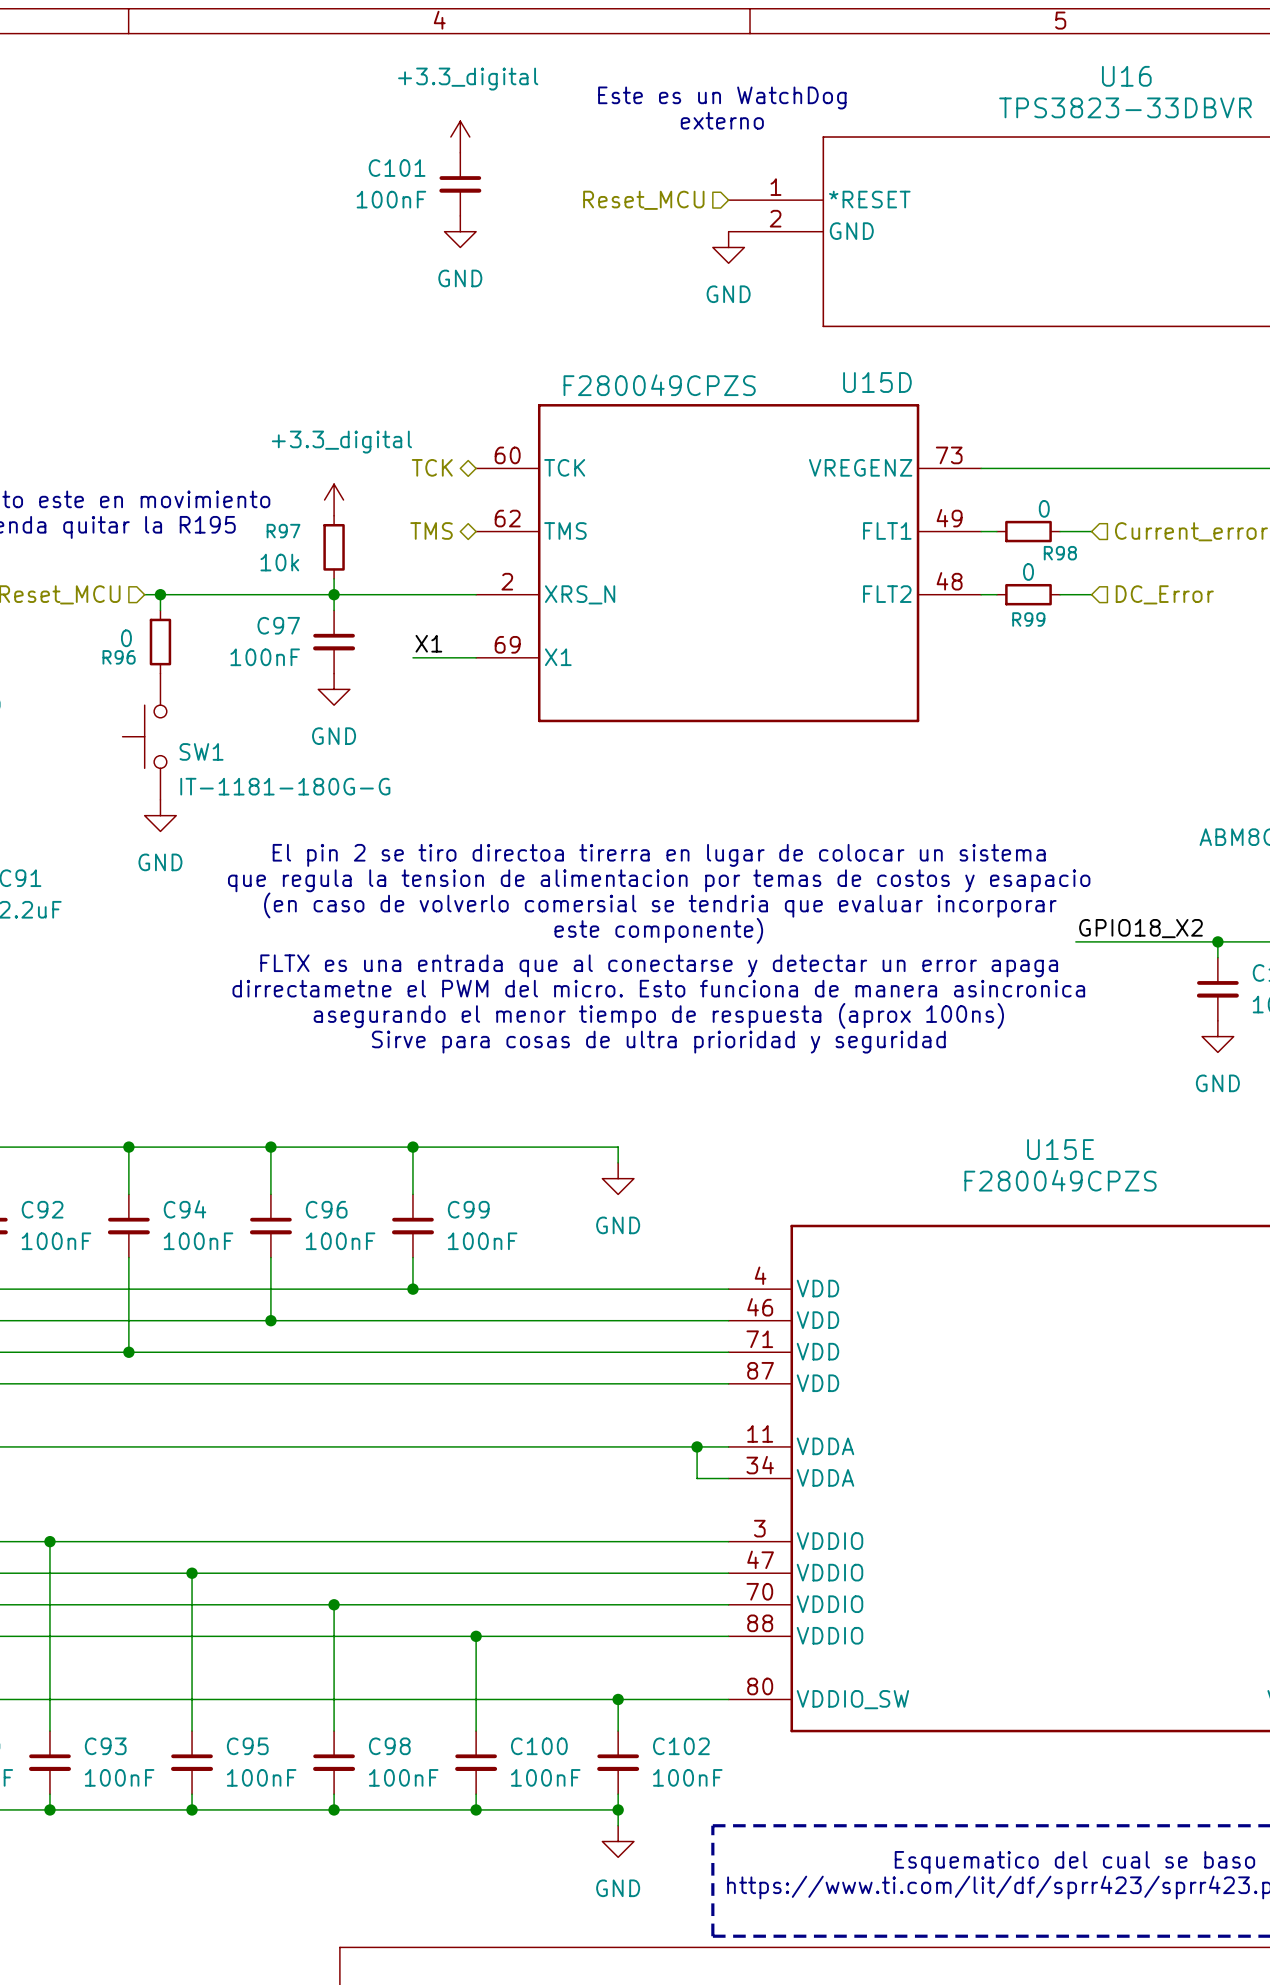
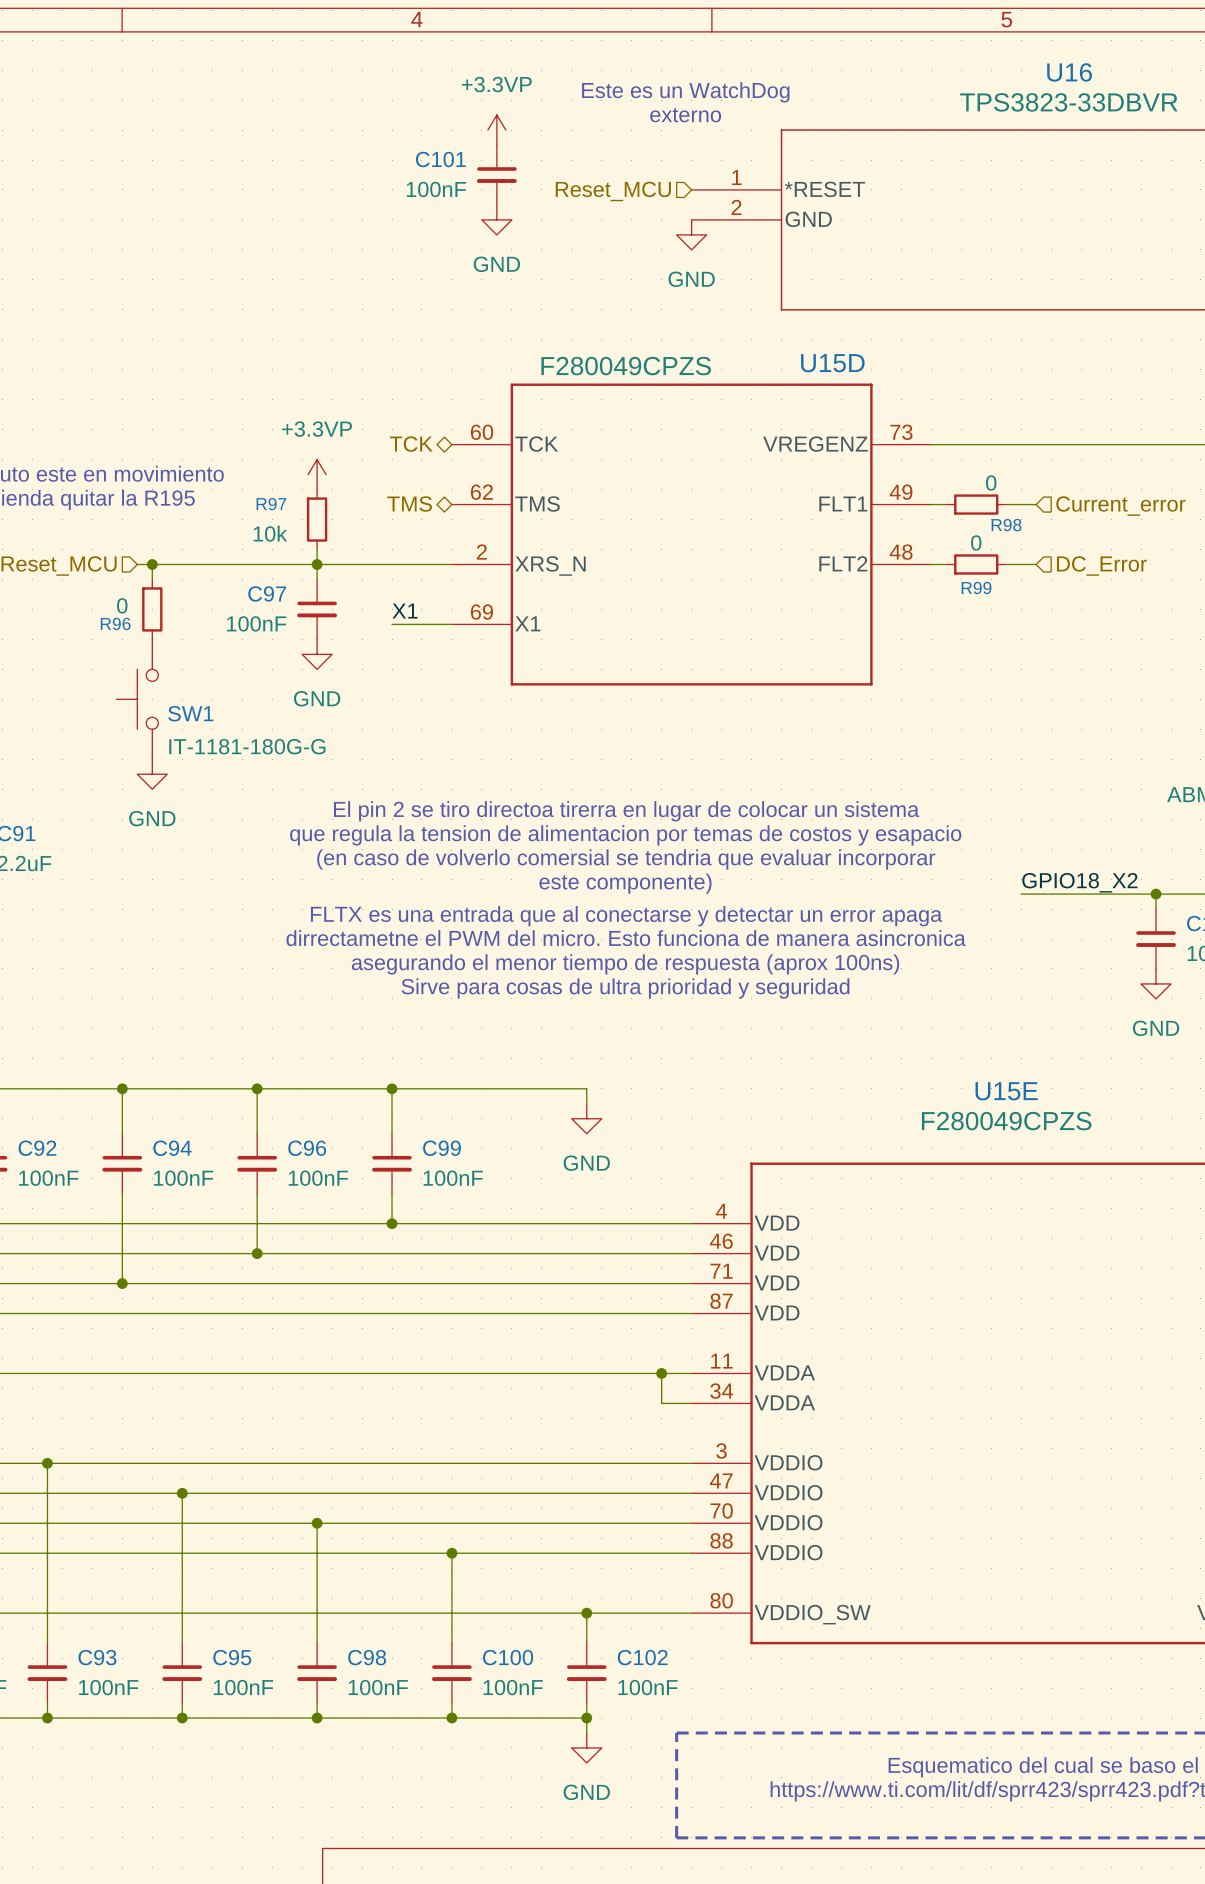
power symbol: +3.3_digital (460, 137) -> none
power symbol: none -> +3.3VP (496, 130)
C101 position: (460, 184) -> (496, 174)
power symbol position: GND (460, 231) -> GND (496, 219)
power symbol: +3.3_digital (334, 500) -> +3.3VP (317, 474)

